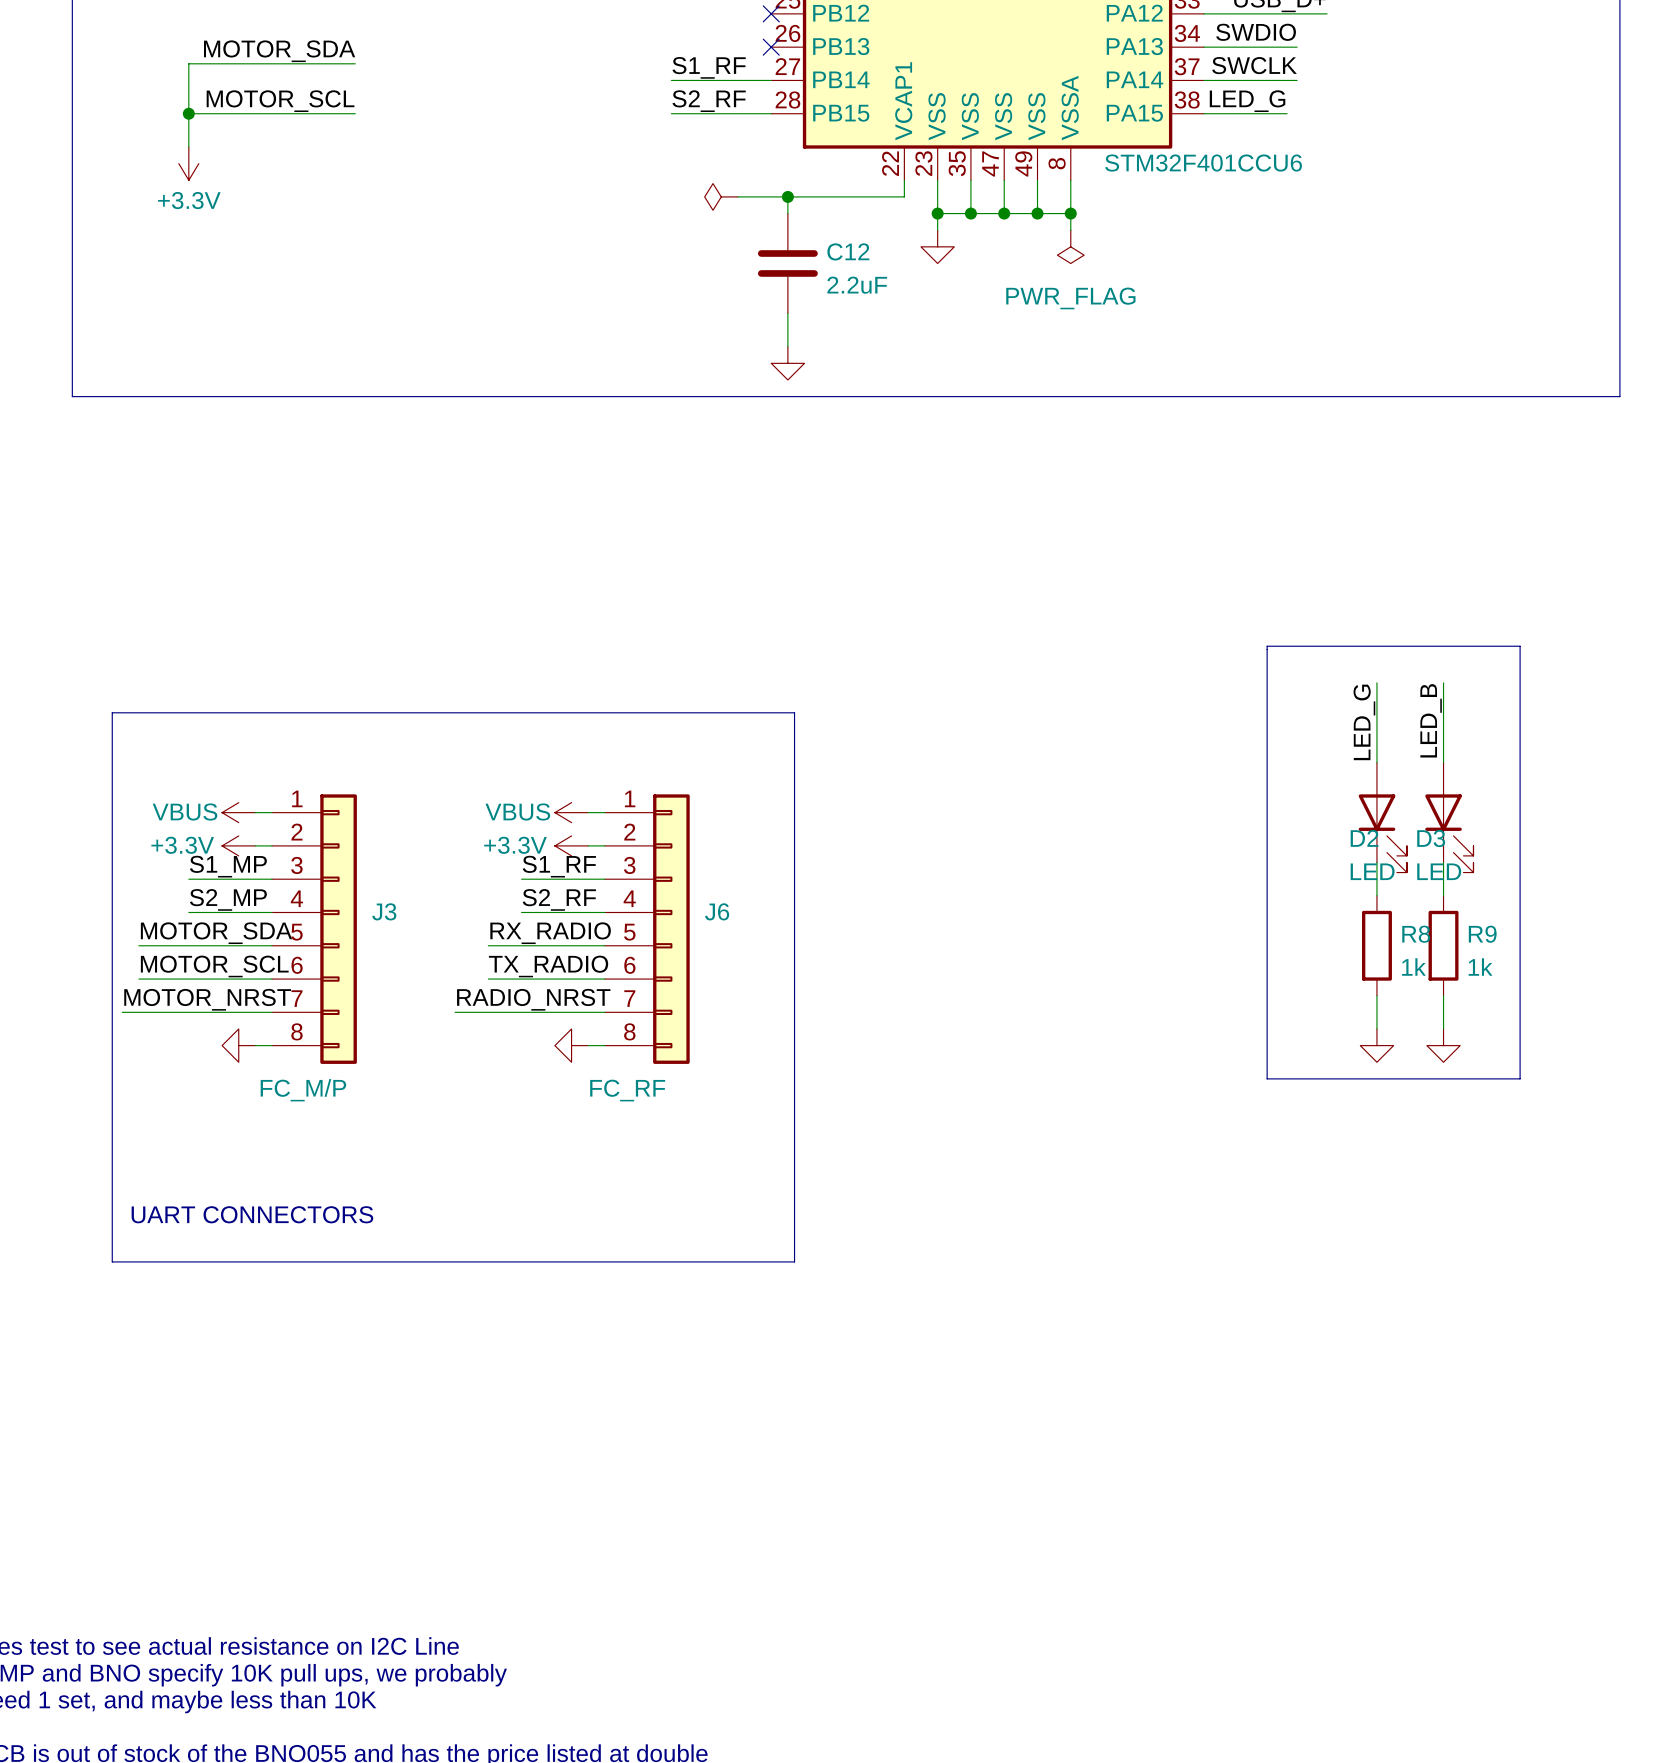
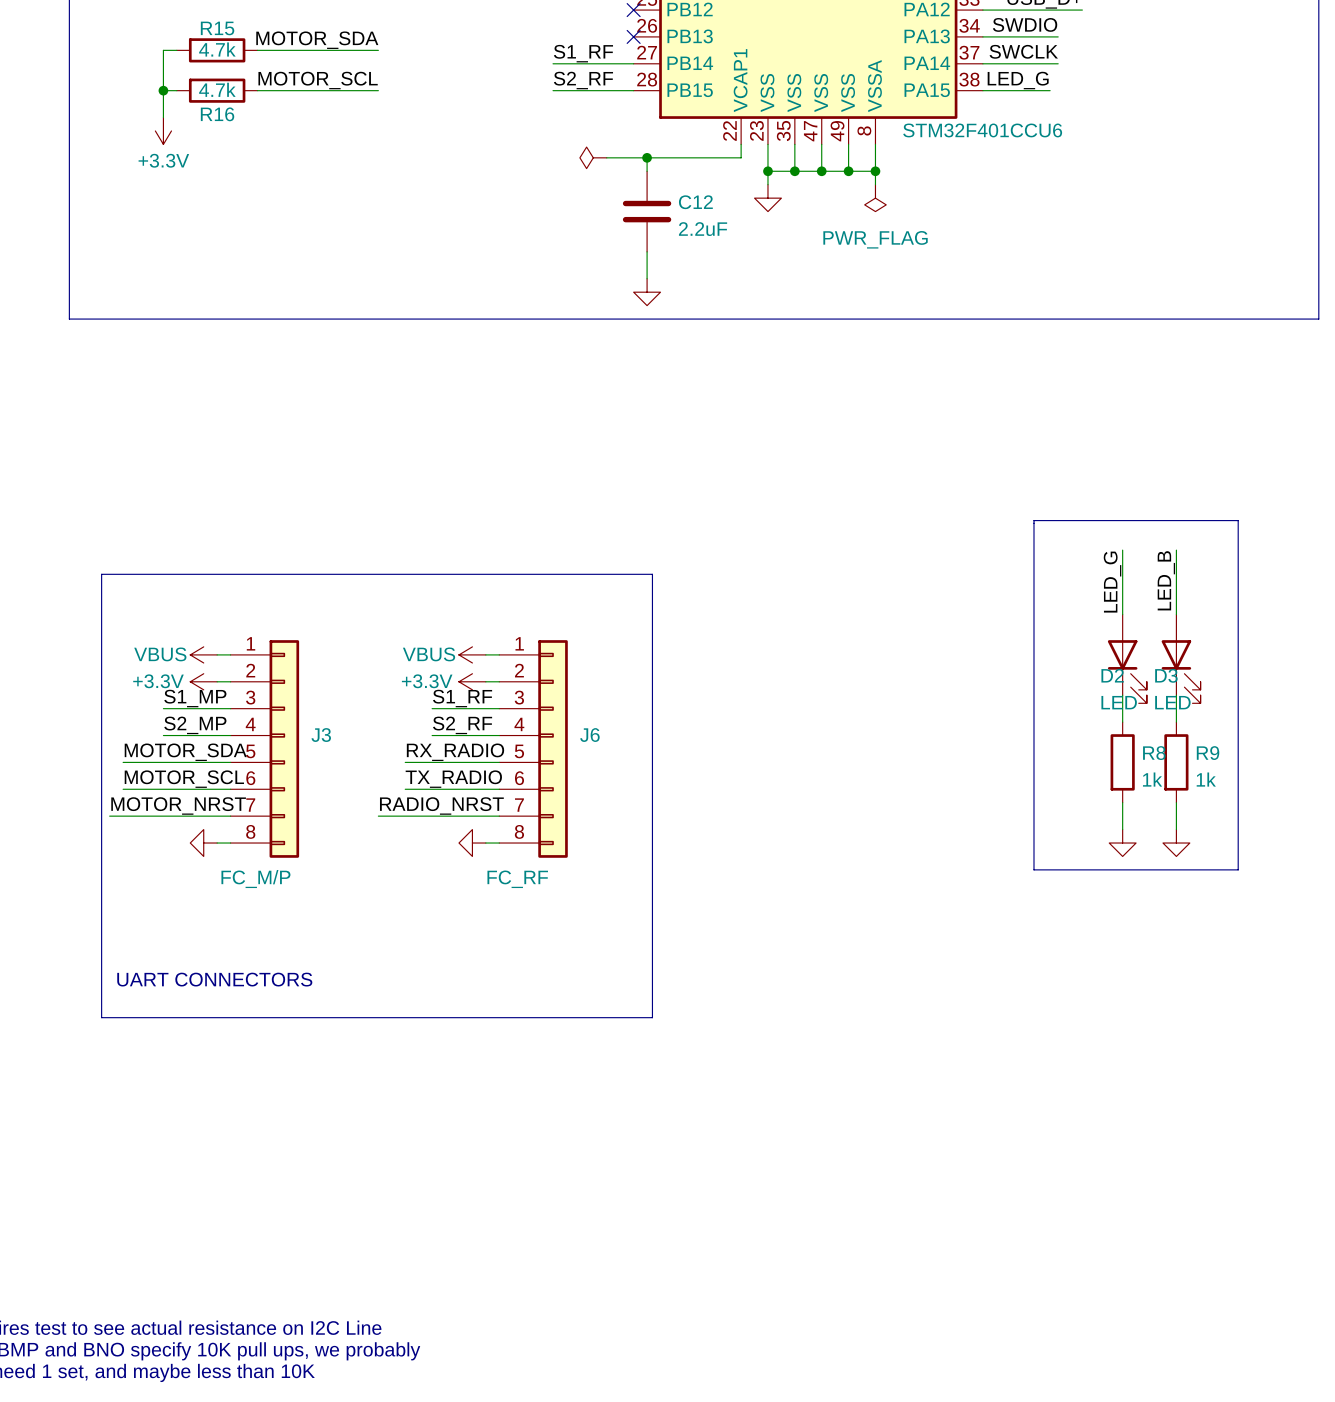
label position: MOTOR_SDA (279, 51) -> MOTOR_SDA (317, 40)
wire: (205, 63) (305, 63) -> (297, 50) (378, 50)
R15: none -> 4.7k (217, 50)
label position: MOTOR_SCL (280, 101) -> MOTOR_SCL (318, 80)
wire: (205, 113) (305, 113) -> (297, 90) (378, 90)
R16: none -> 4.7k (217, 90)

